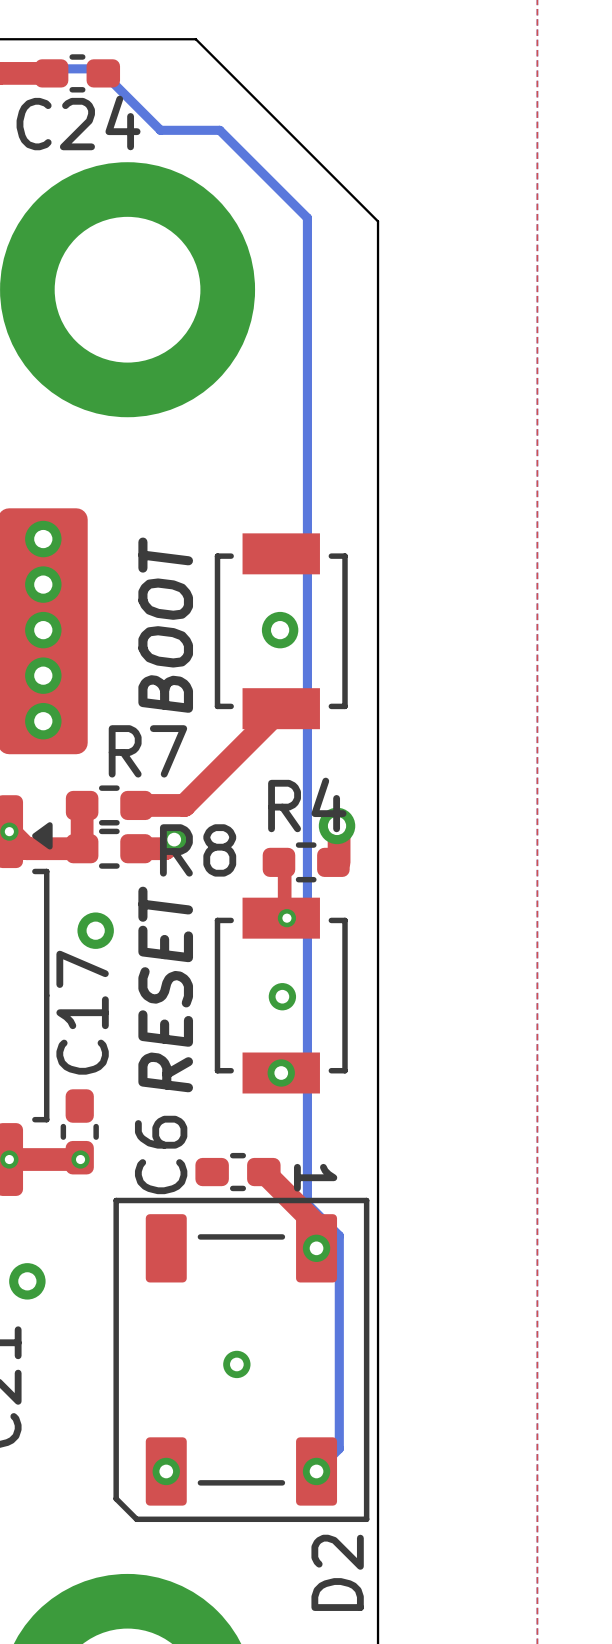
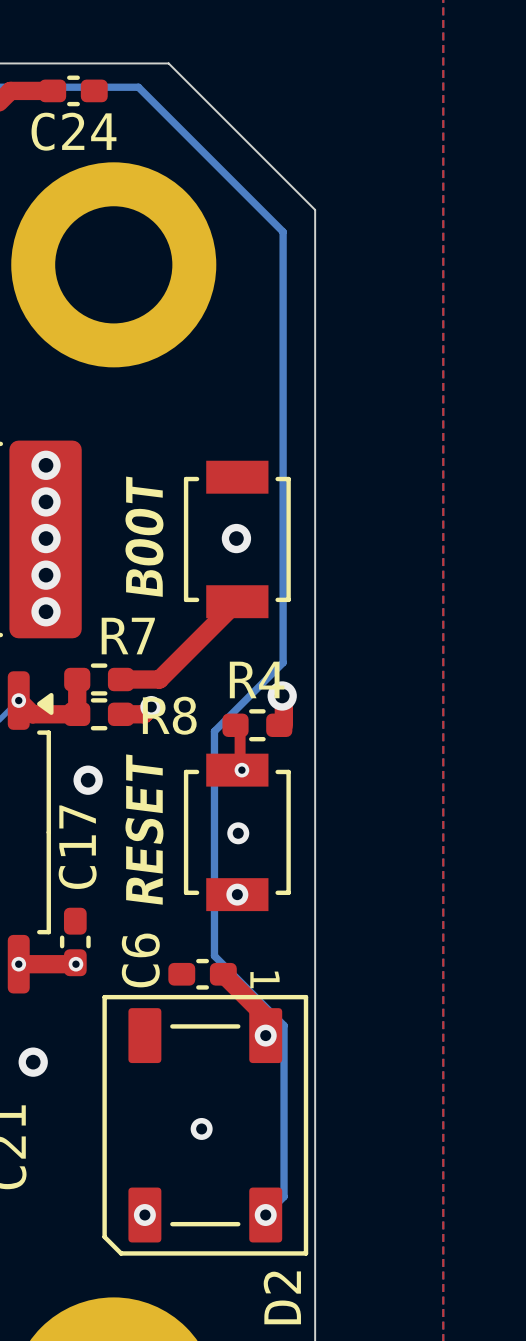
bottom track: (99, 68) (160, 130) (219, 130) -> (90, 87) (138, 87) (187, 136)
bottom track: (307, 217) (307, 1203) -> (258, 207) (283, 231) (283, 662) (214, 731) (214, 955) (258, 999)

